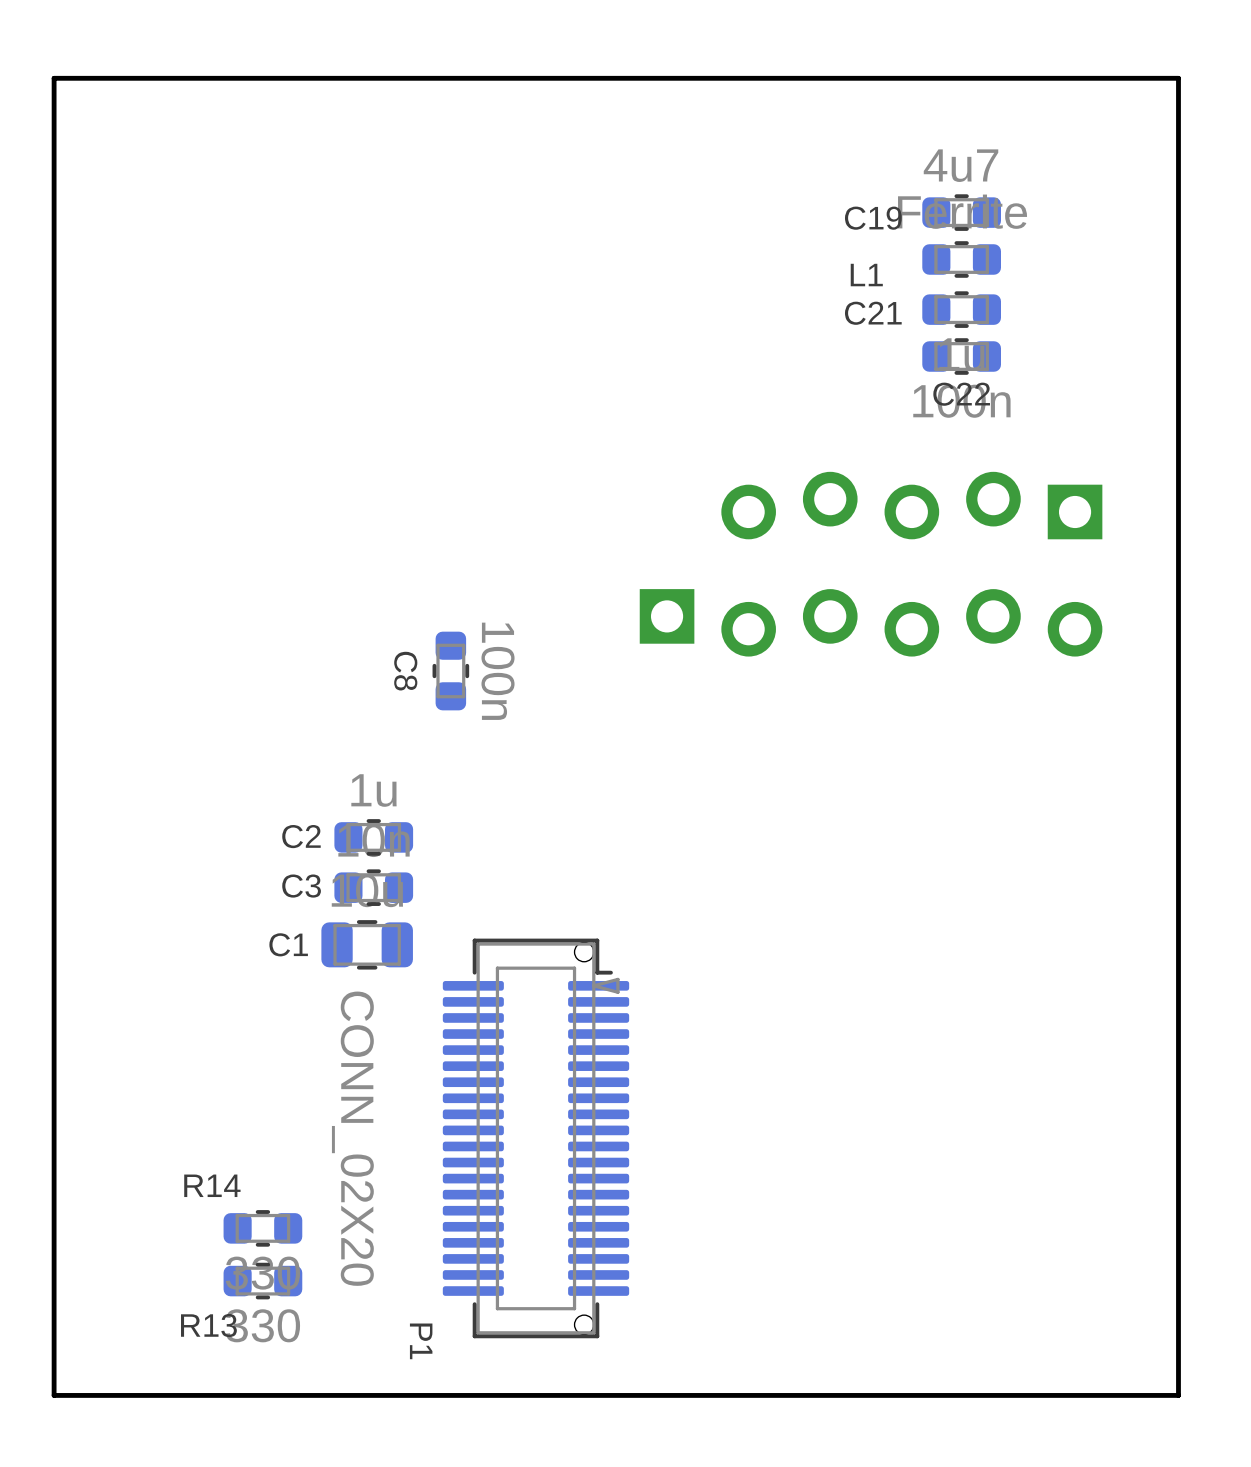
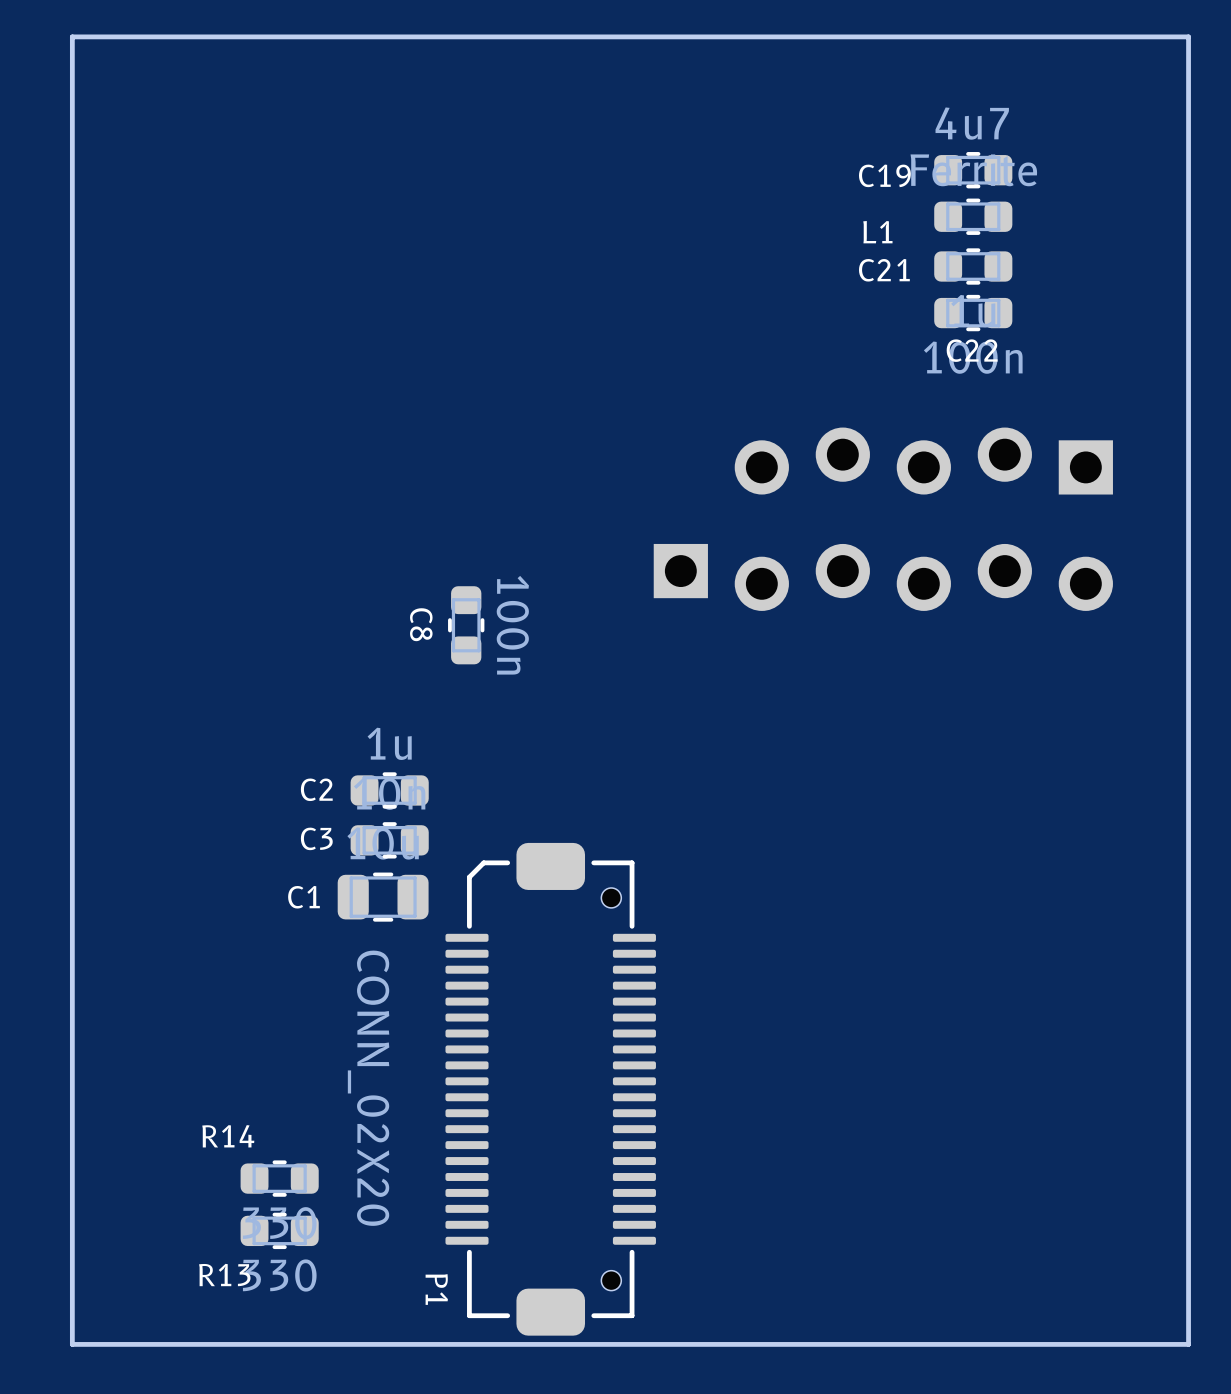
P1 footprint: [442, 938, 630, 1339] -> [445, 842, 656, 1336]

